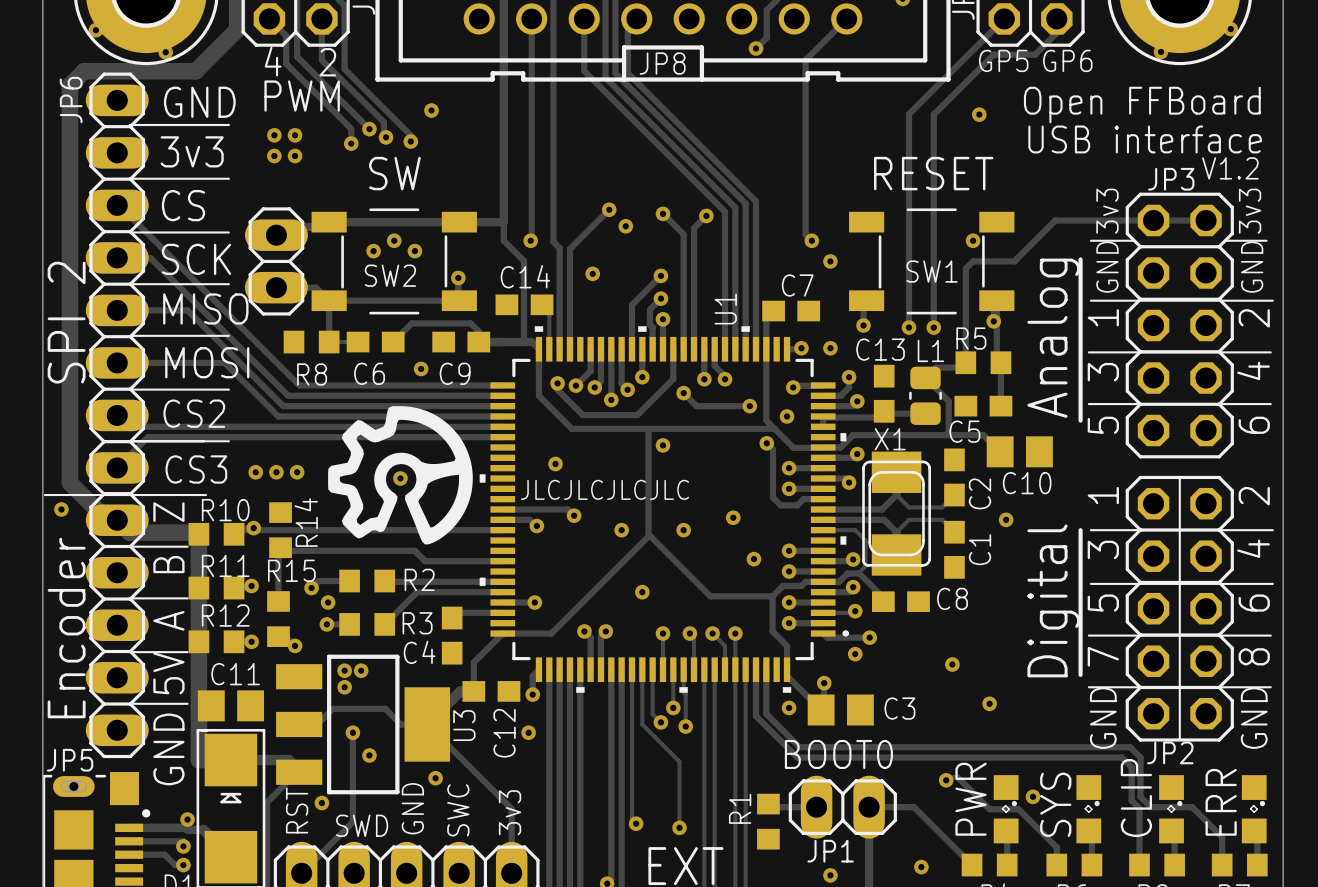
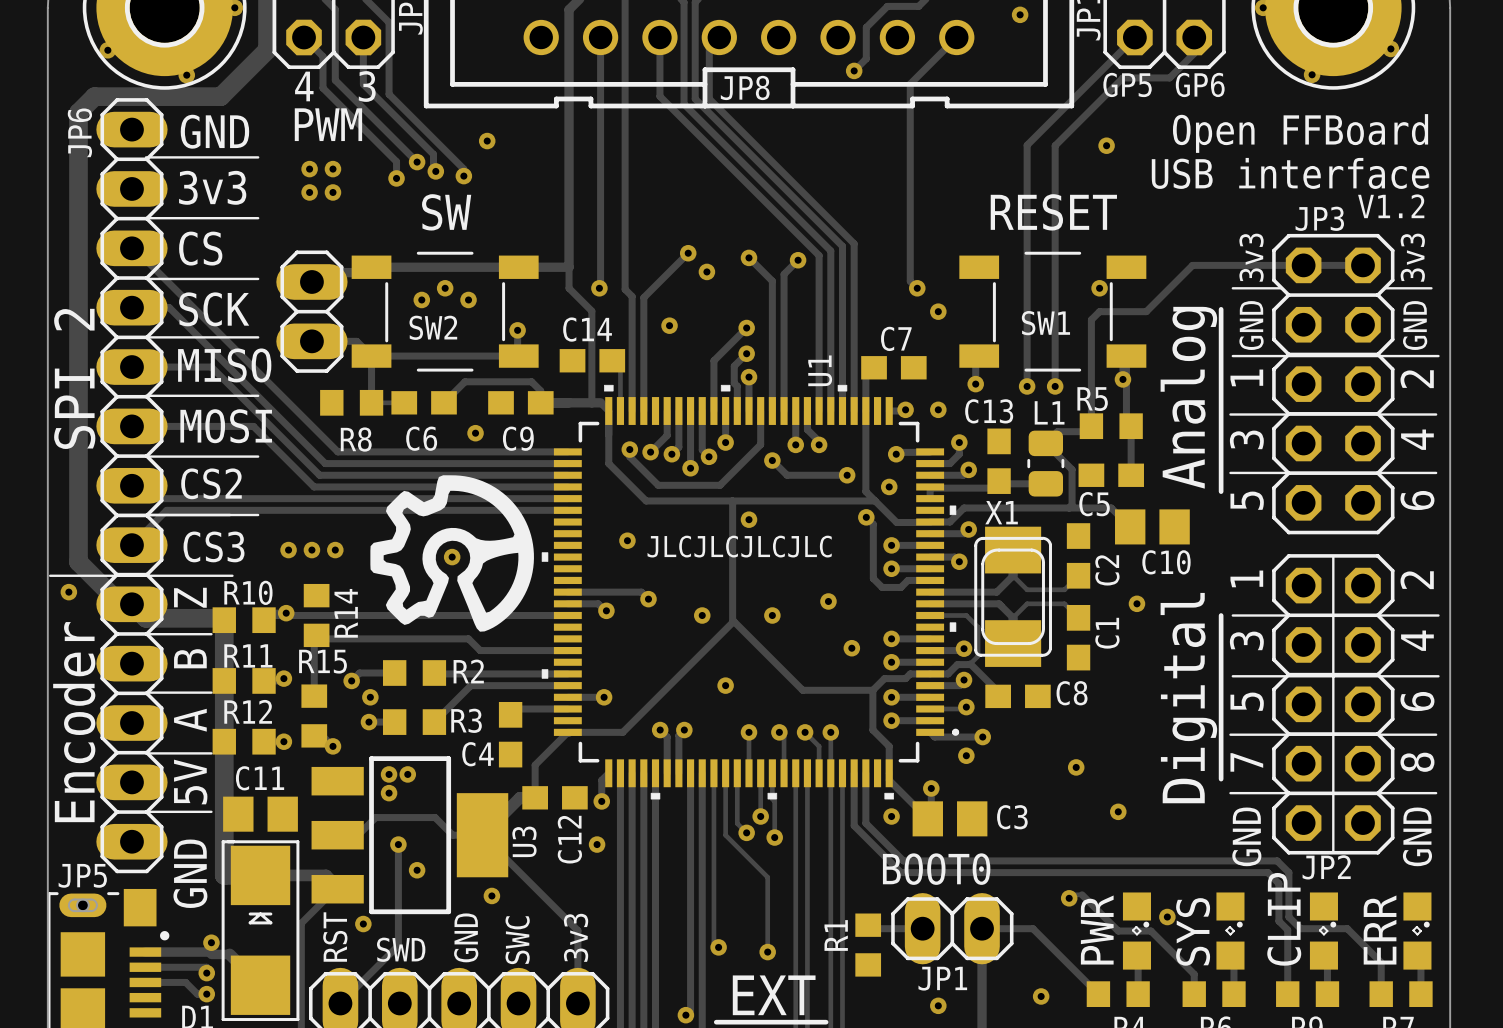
text: 2 (327, 62) -> 3 (367, 86)
text position: JLCJLCJLCJLC (604, 489) -> JLCJLCJLCJLC (739, 546)

